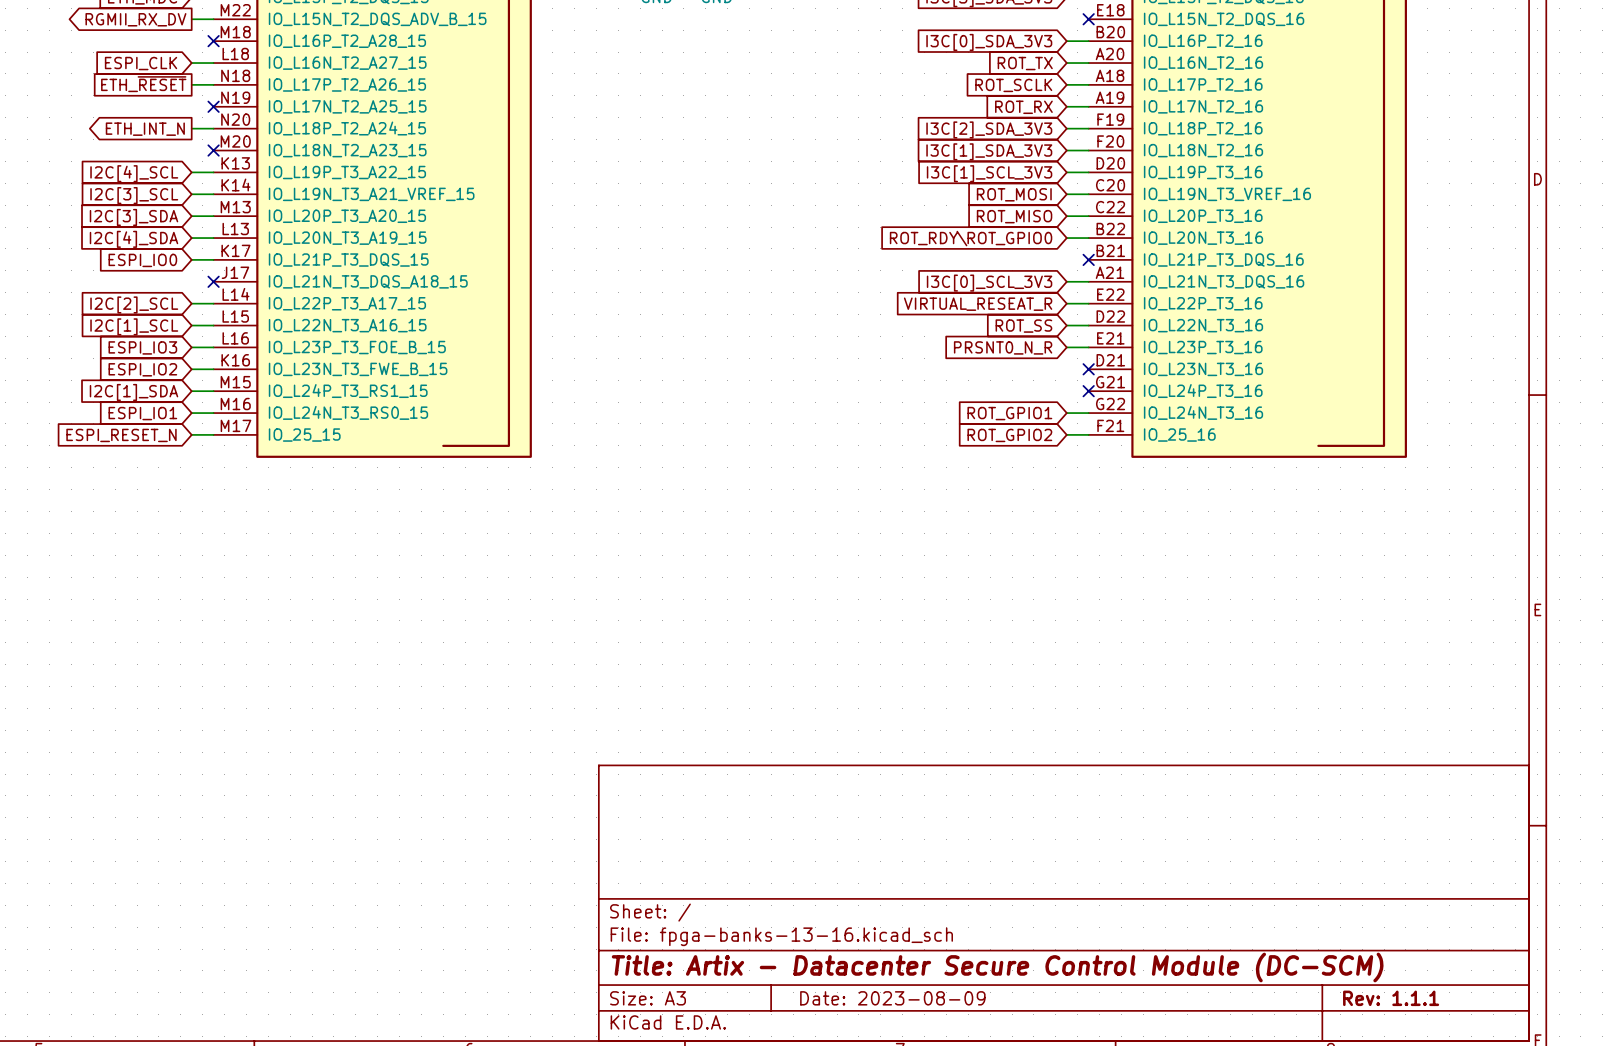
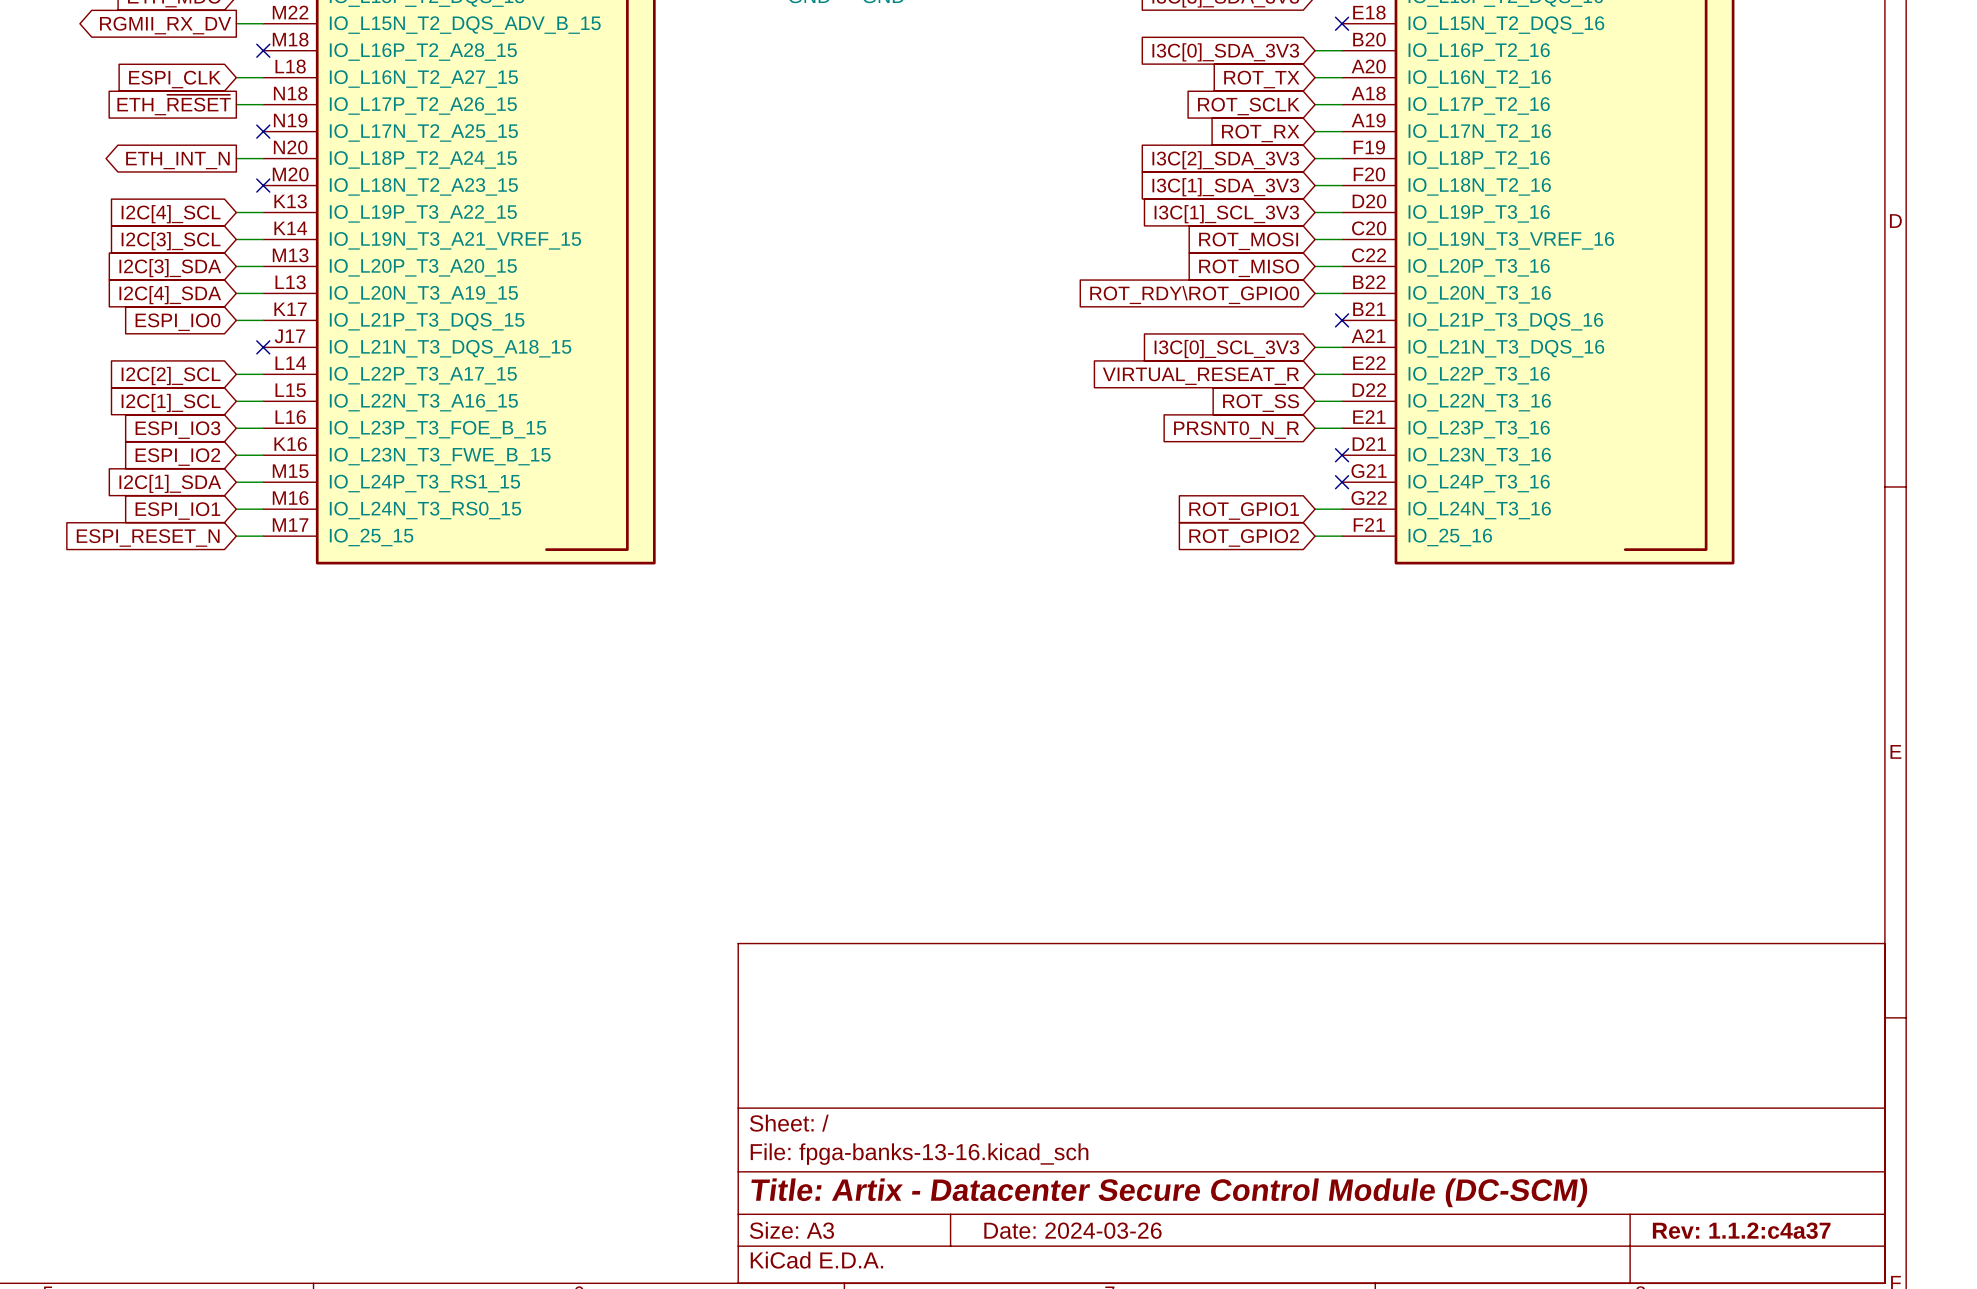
title block: Date: 2023-08-09 (892, 998) -> Date: 2024-03-26 (1072, 1230)
title block: Rev: 1.1.1 (1391, 998) -> Rev: 1.1.2:c4a37 (1741, 1230)

